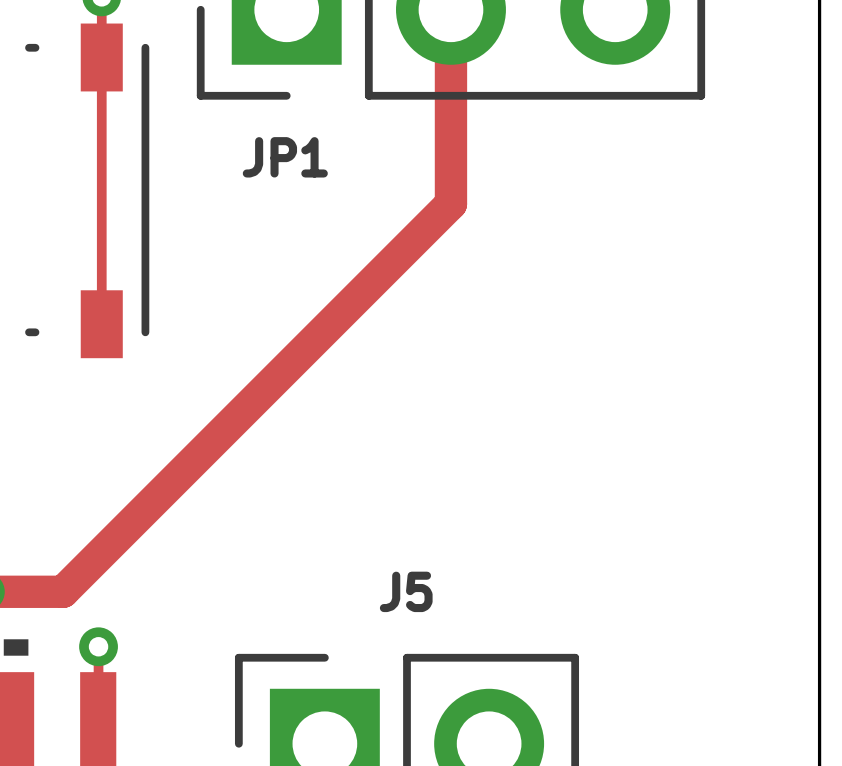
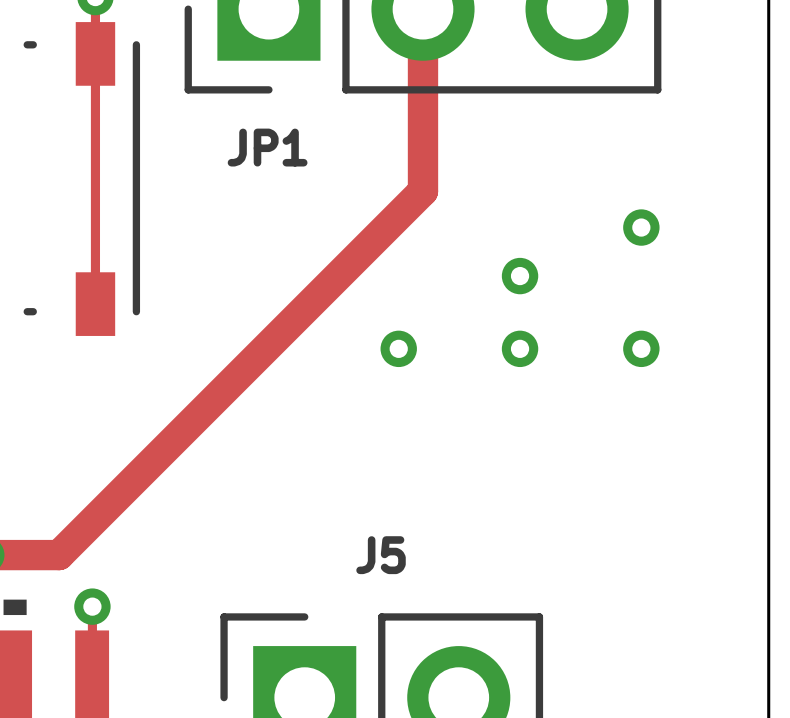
via: none -> (641, 227)
via: none -> (520, 276)
via: none -> (398, 348)
via: none -> (520, 348)
via: none -> (641, 348)

